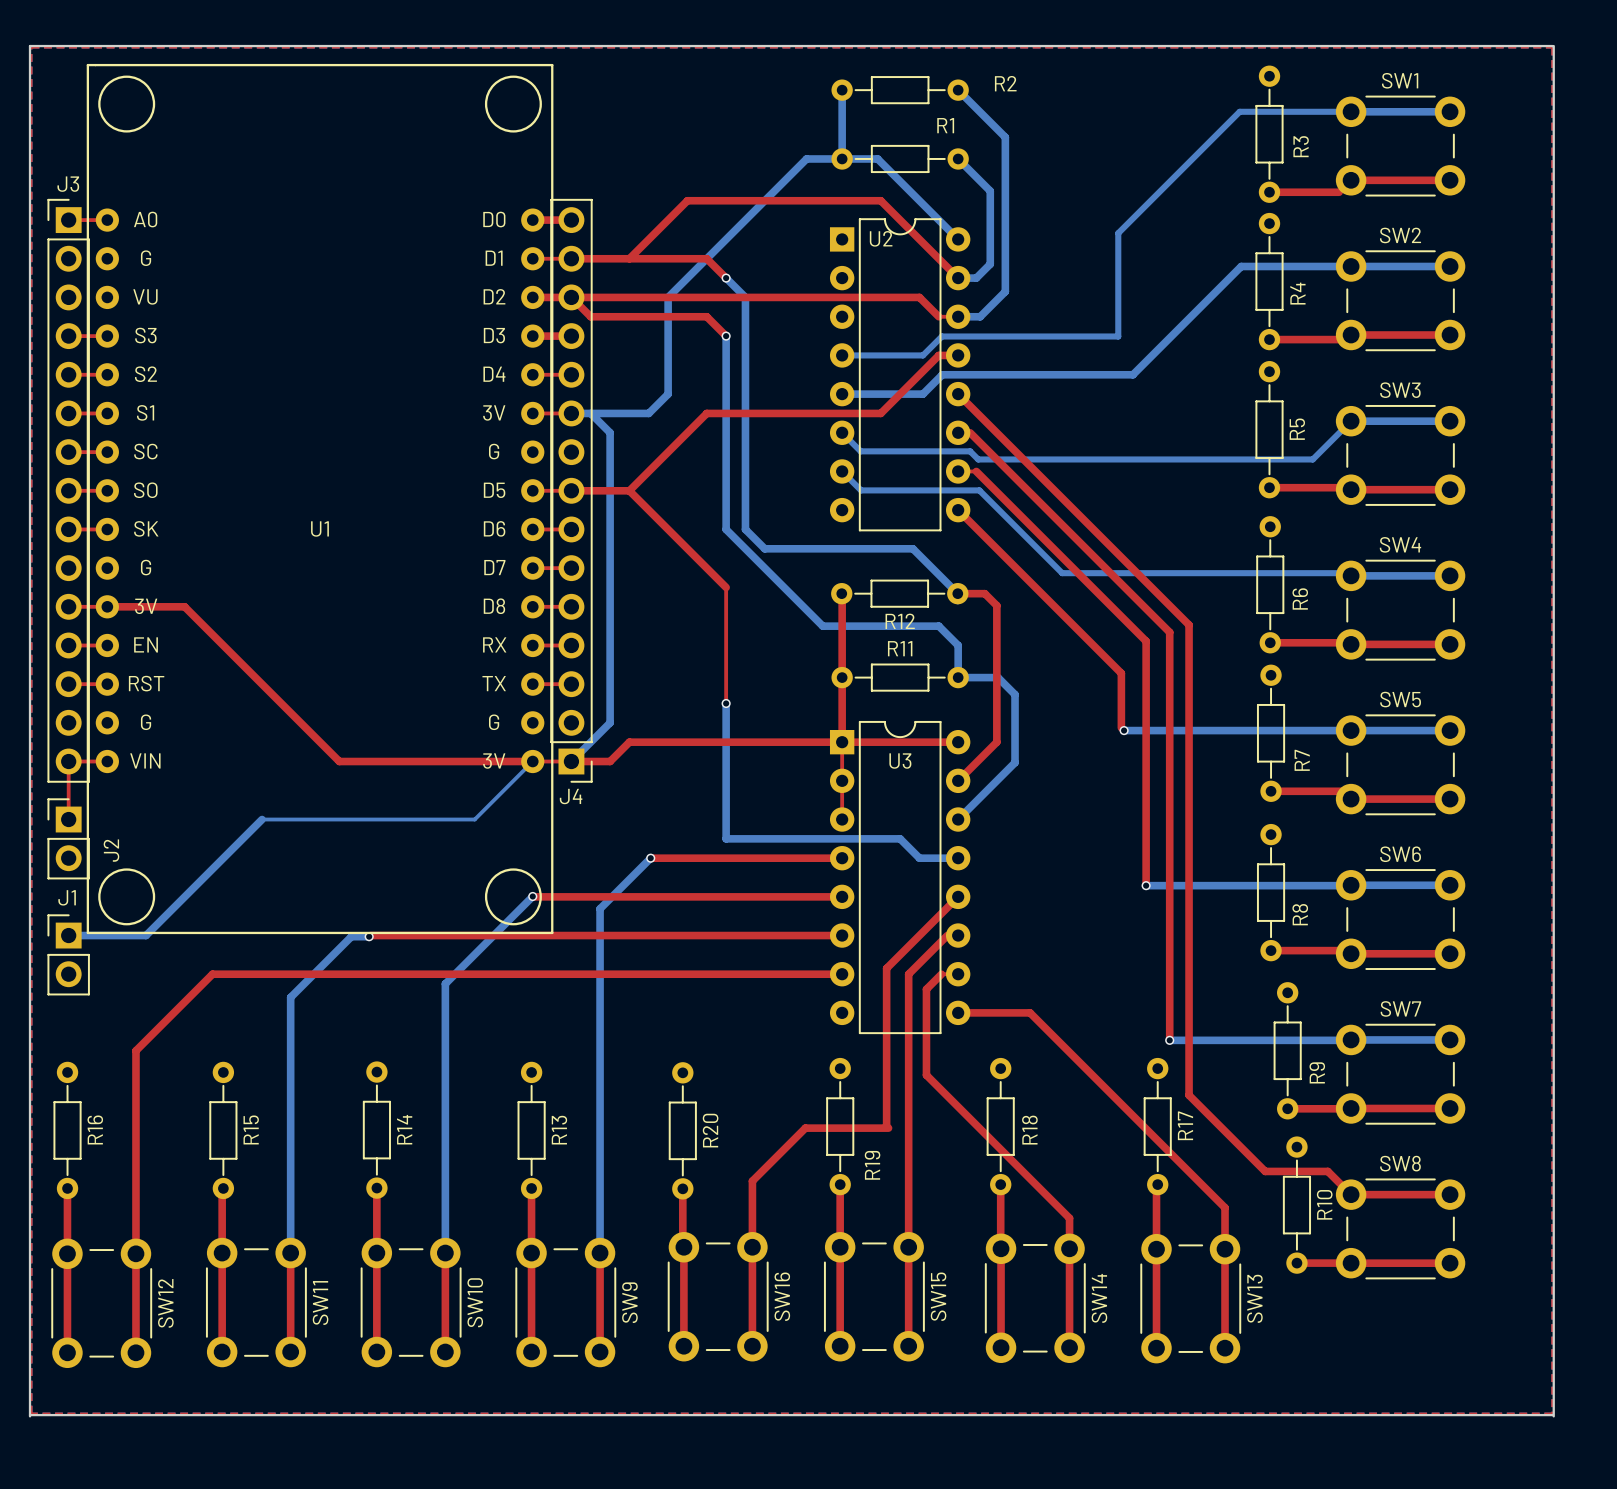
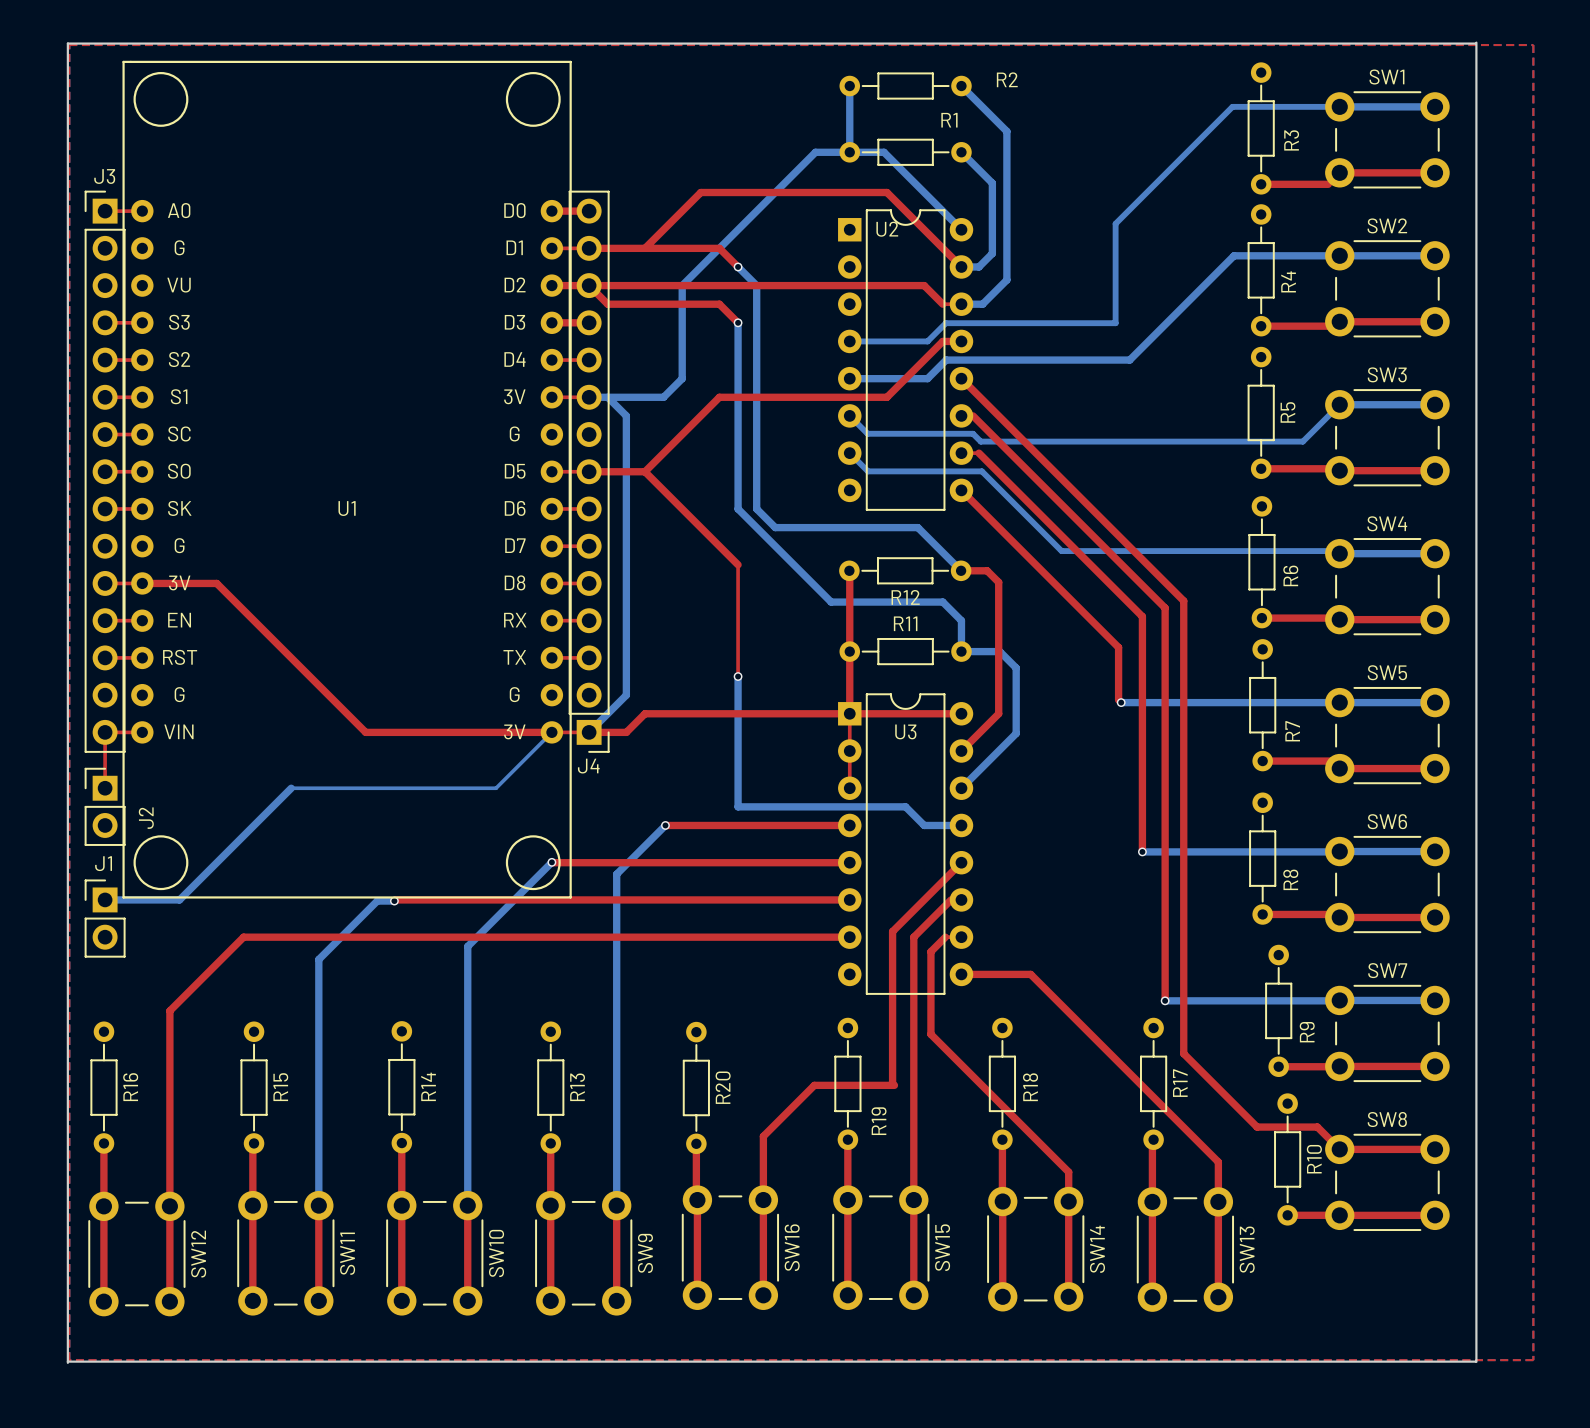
board edge: (1491, 46) (1552, 46) -> none
board edge: (1553, 46) (1553, 1416) -> (1476, 42) (1476, 1361)
board edge: (1491, 1415) (1552, 1415) -> none

